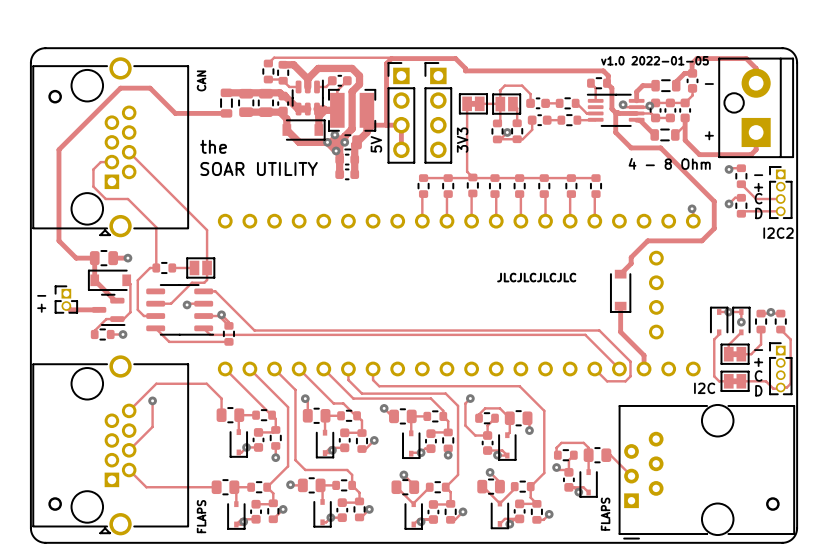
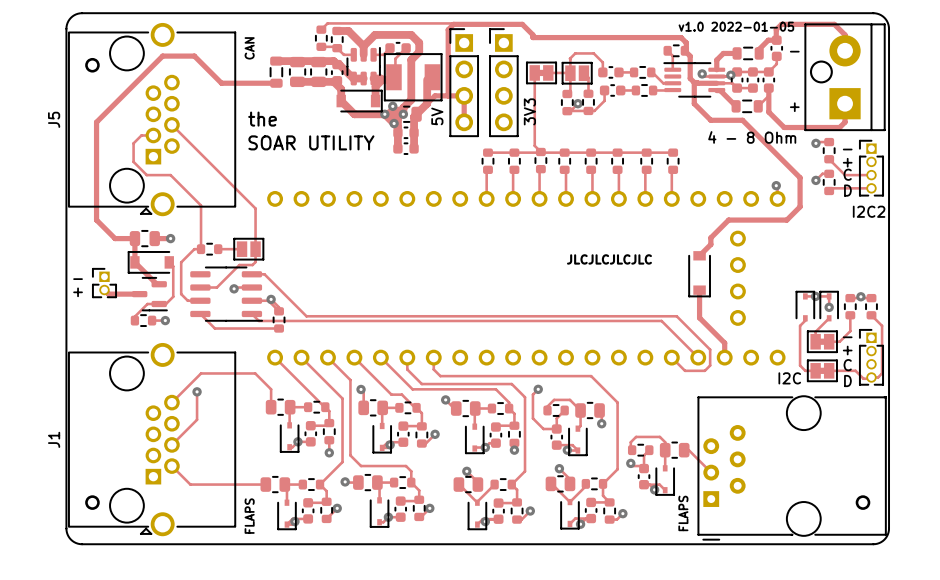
part footprint: [328, 89, 376, 132] -> [384, 53, 443, 102]
J5 name: none -> J5 (54, 119)
J1 name: none -> J1 (54, 439)

